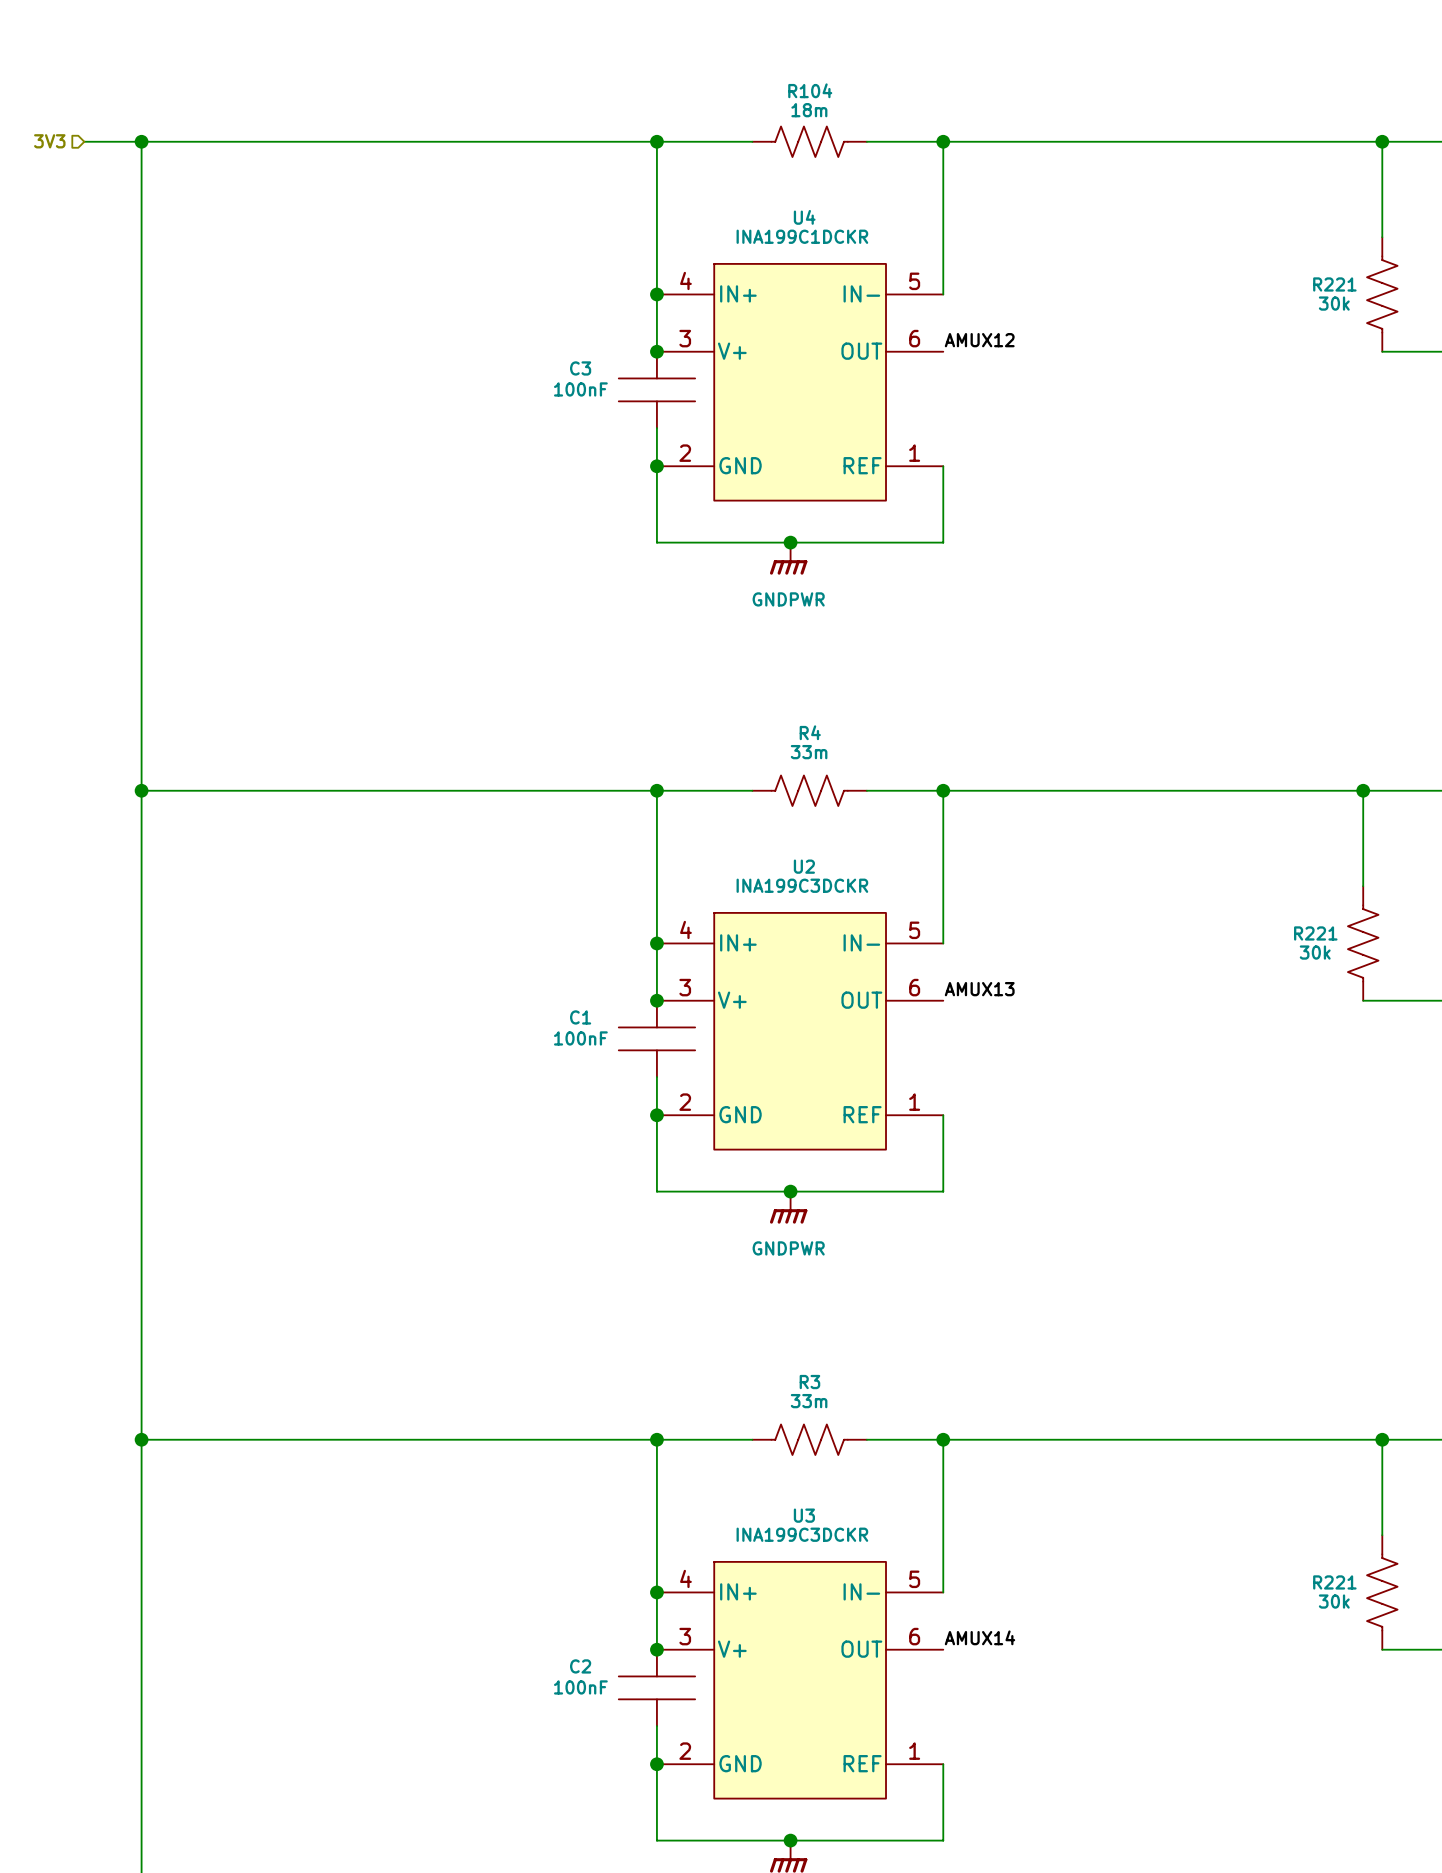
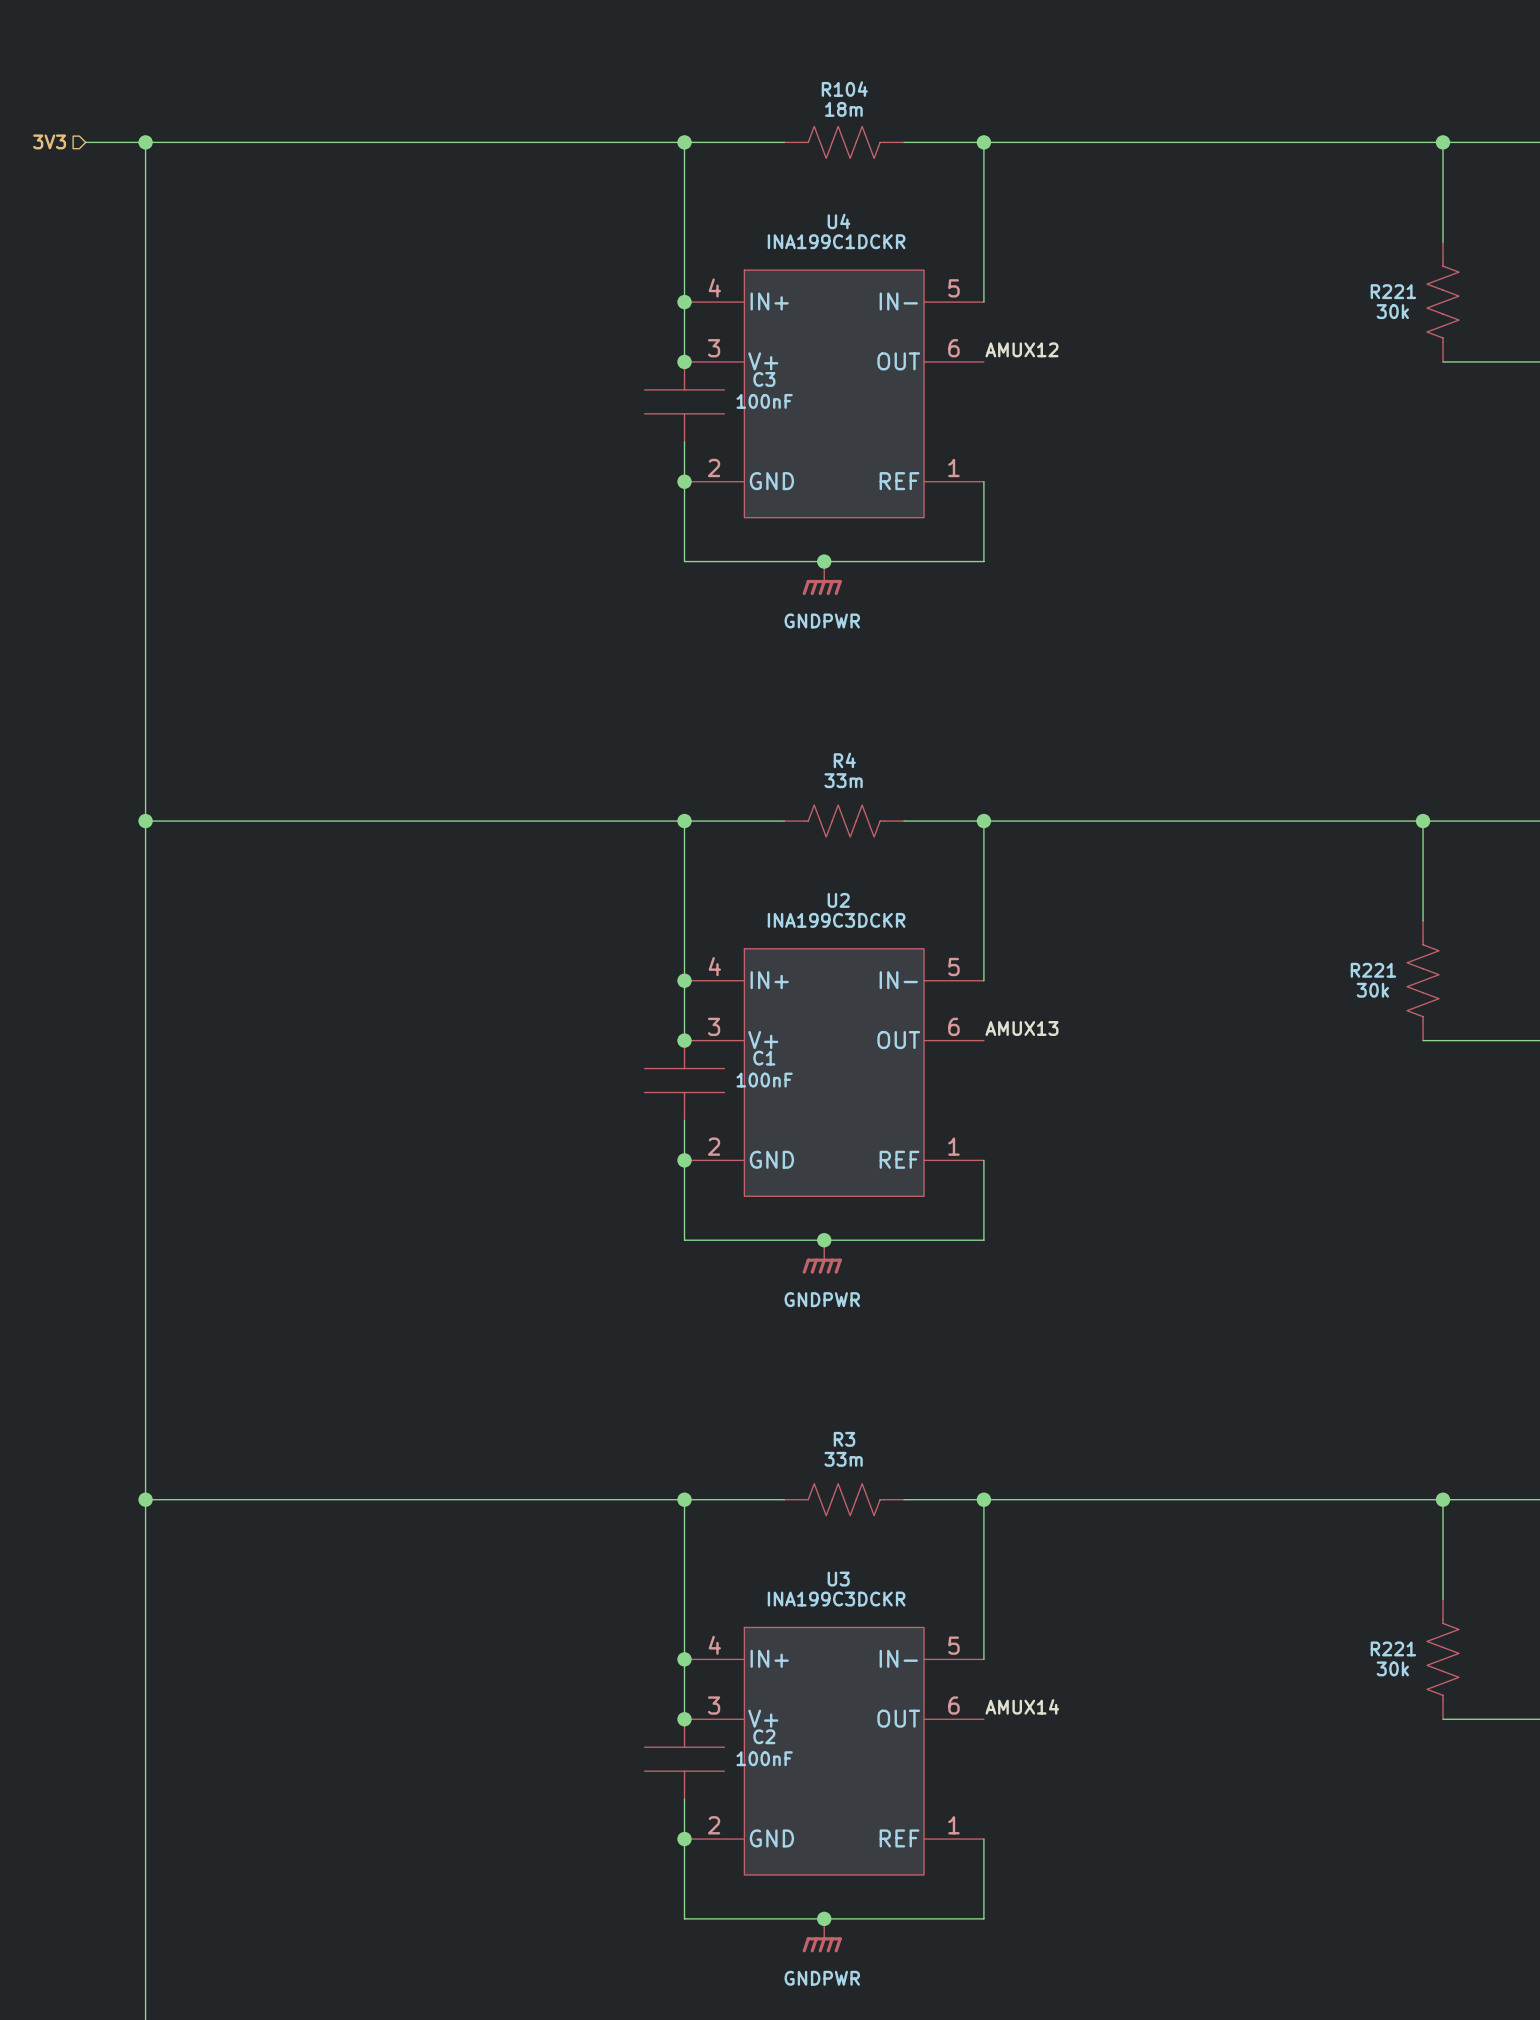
C3 name position: C3 (580, 368) -> C3 (764, 379)
C3 value position: 100nF (580, 389) -> 100nF (764, 401)
C1 name position: C1 (580, 1017) -> C1 (764, 1058)
C1 value position: 100nF (580, 1038) -> 100nF (764, 1080)
C2 name position: C2 (580, 1666) -> C2 (764, 1736)
C2 value position: 100nF (580, 1687) -> 100nF (764, 1758)

